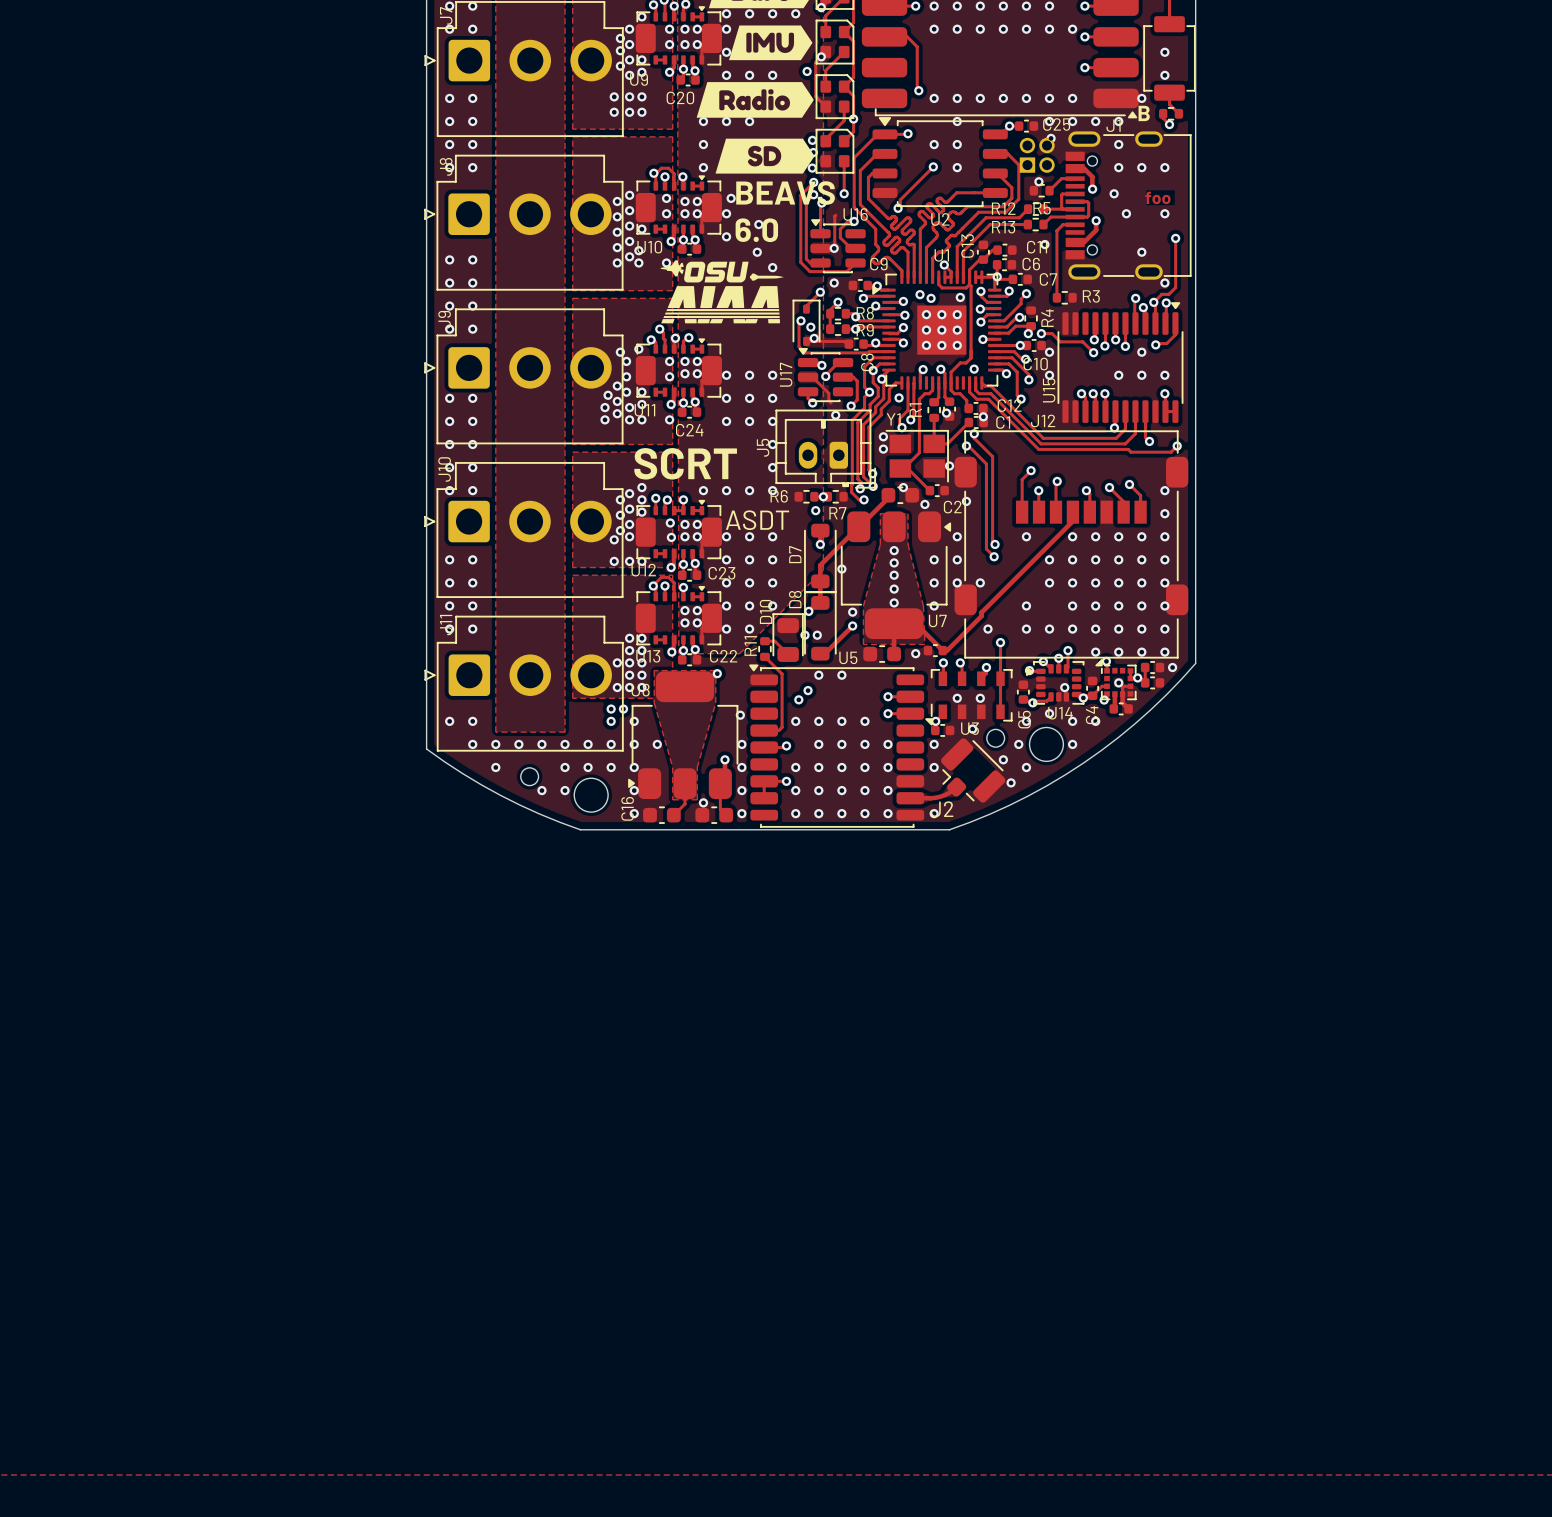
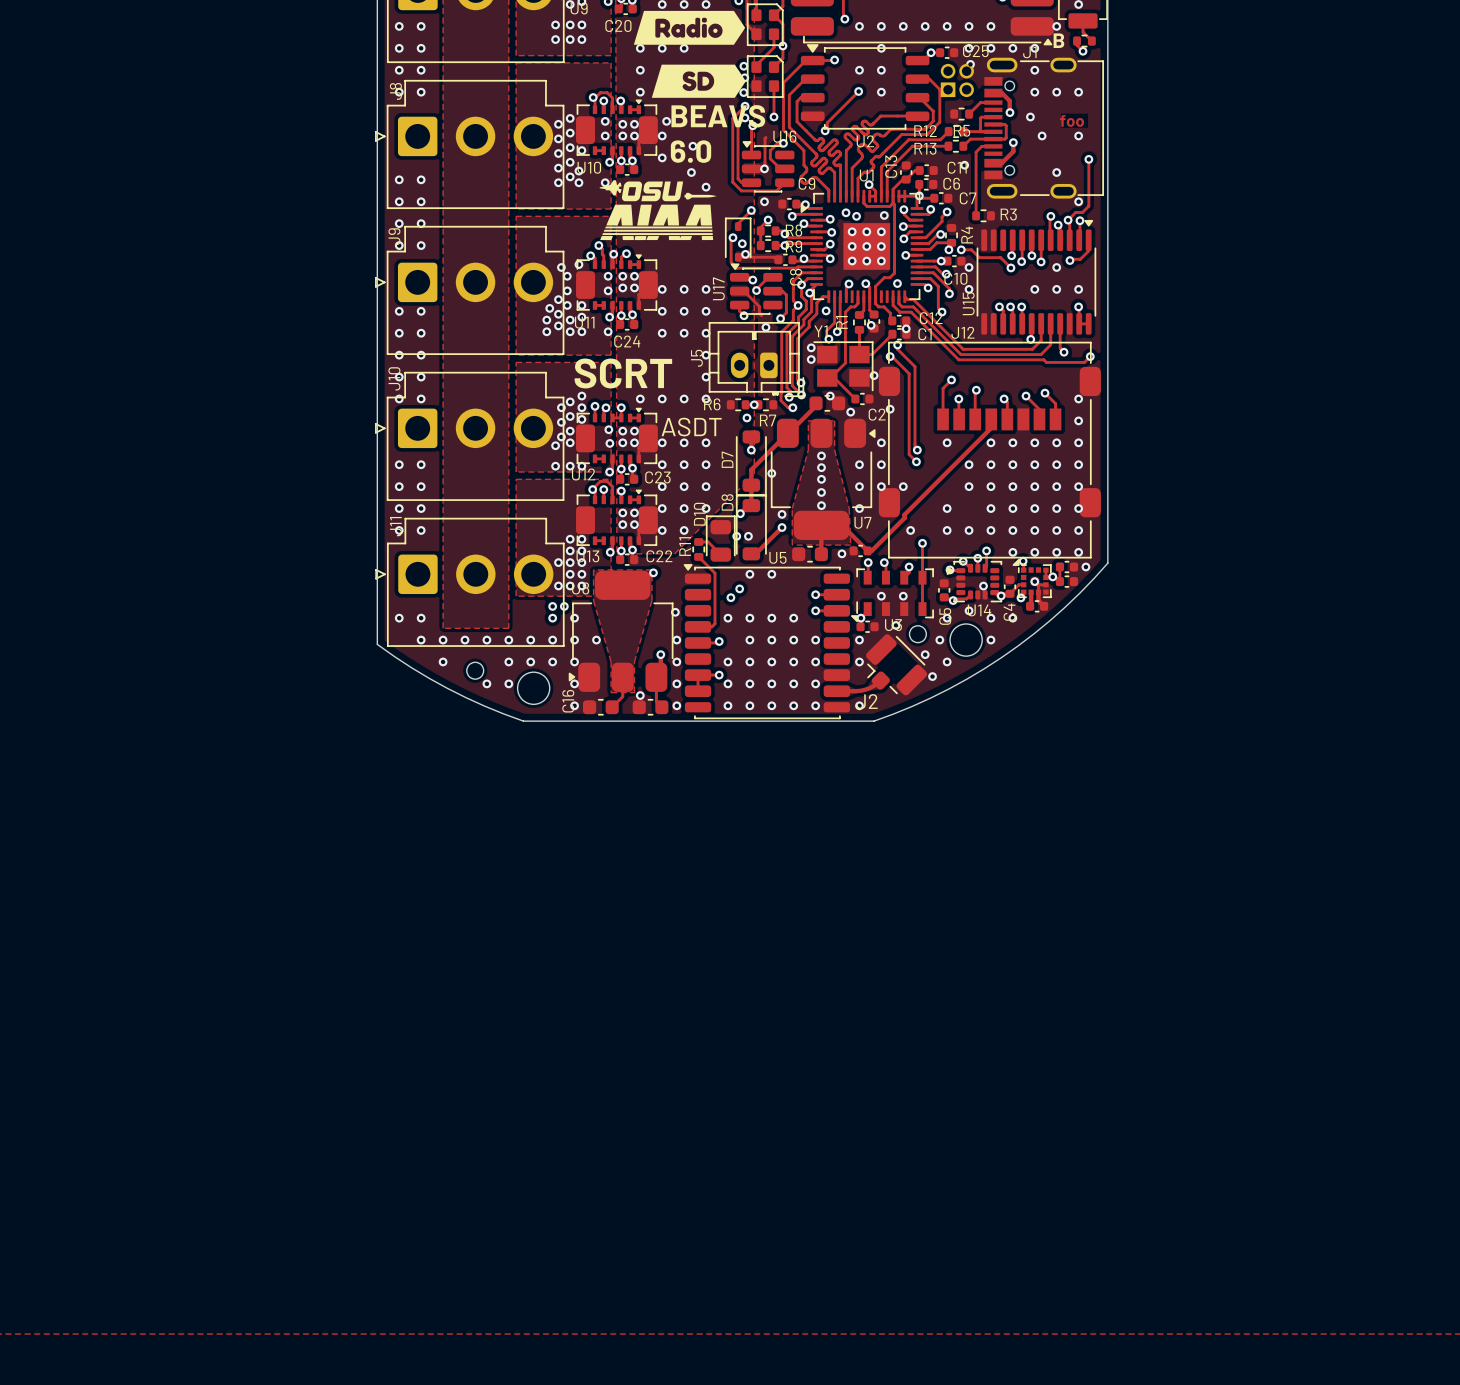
via: (1038, 181) -> none

